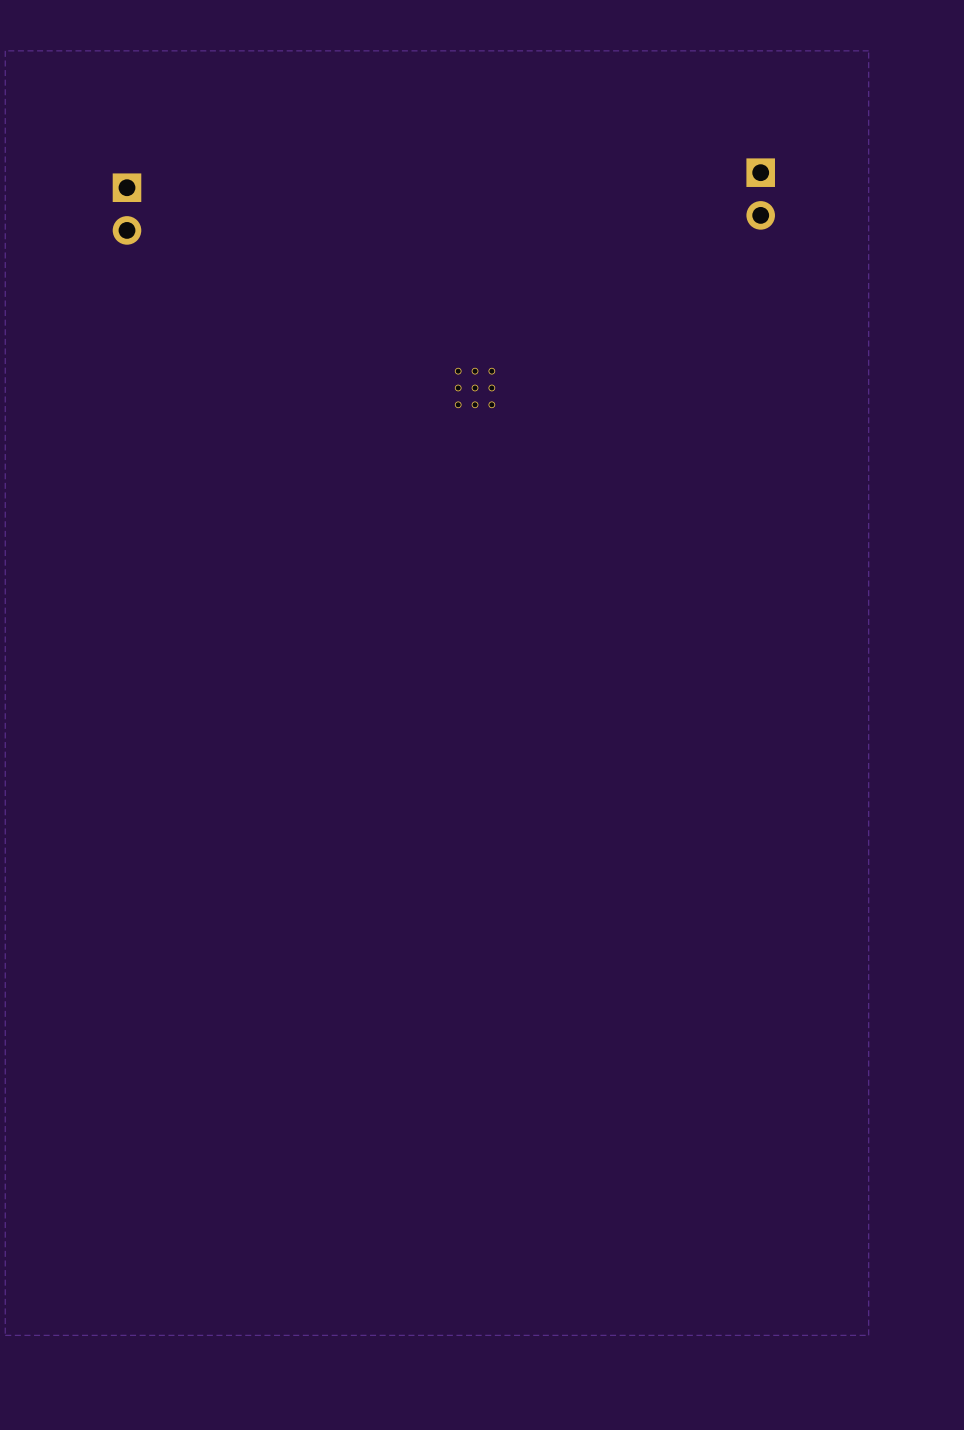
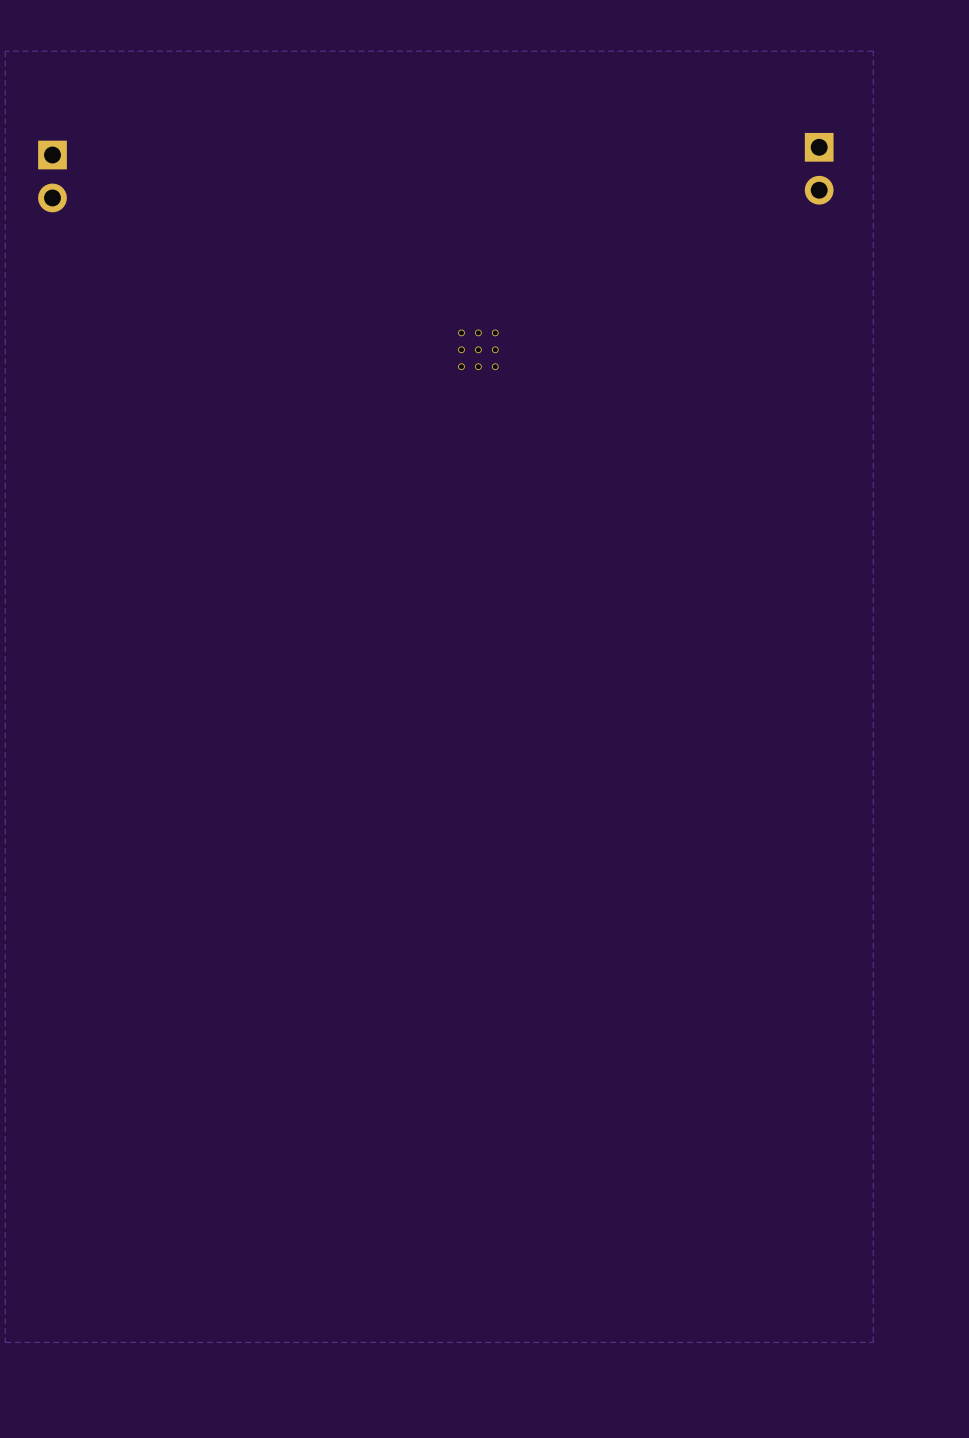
part position: (760, 194) -> (819, 168)
part position: (126, 209) -> (52, 176)
part position: (475, 387) -> (478, 349)

